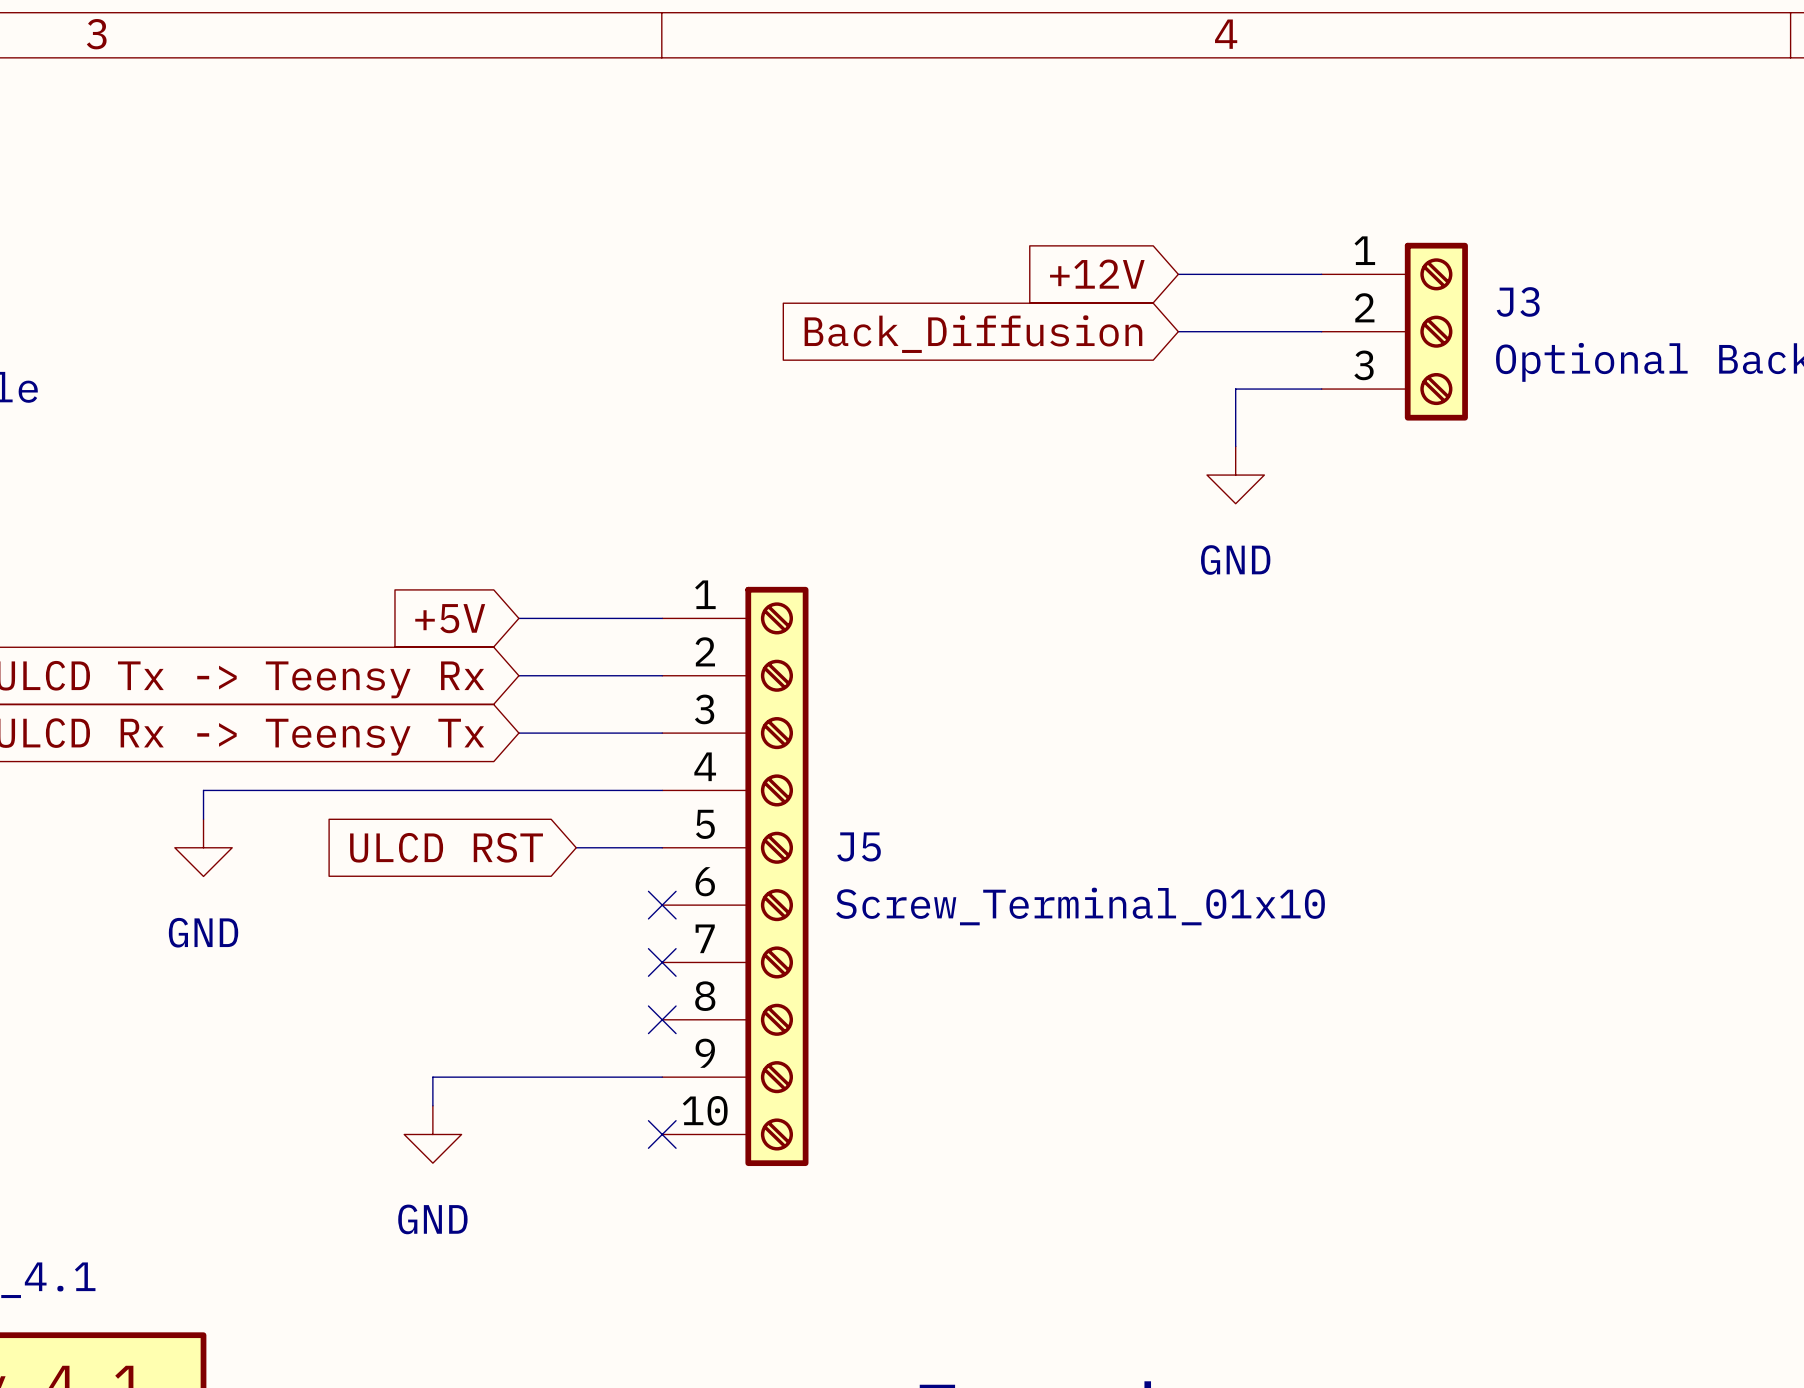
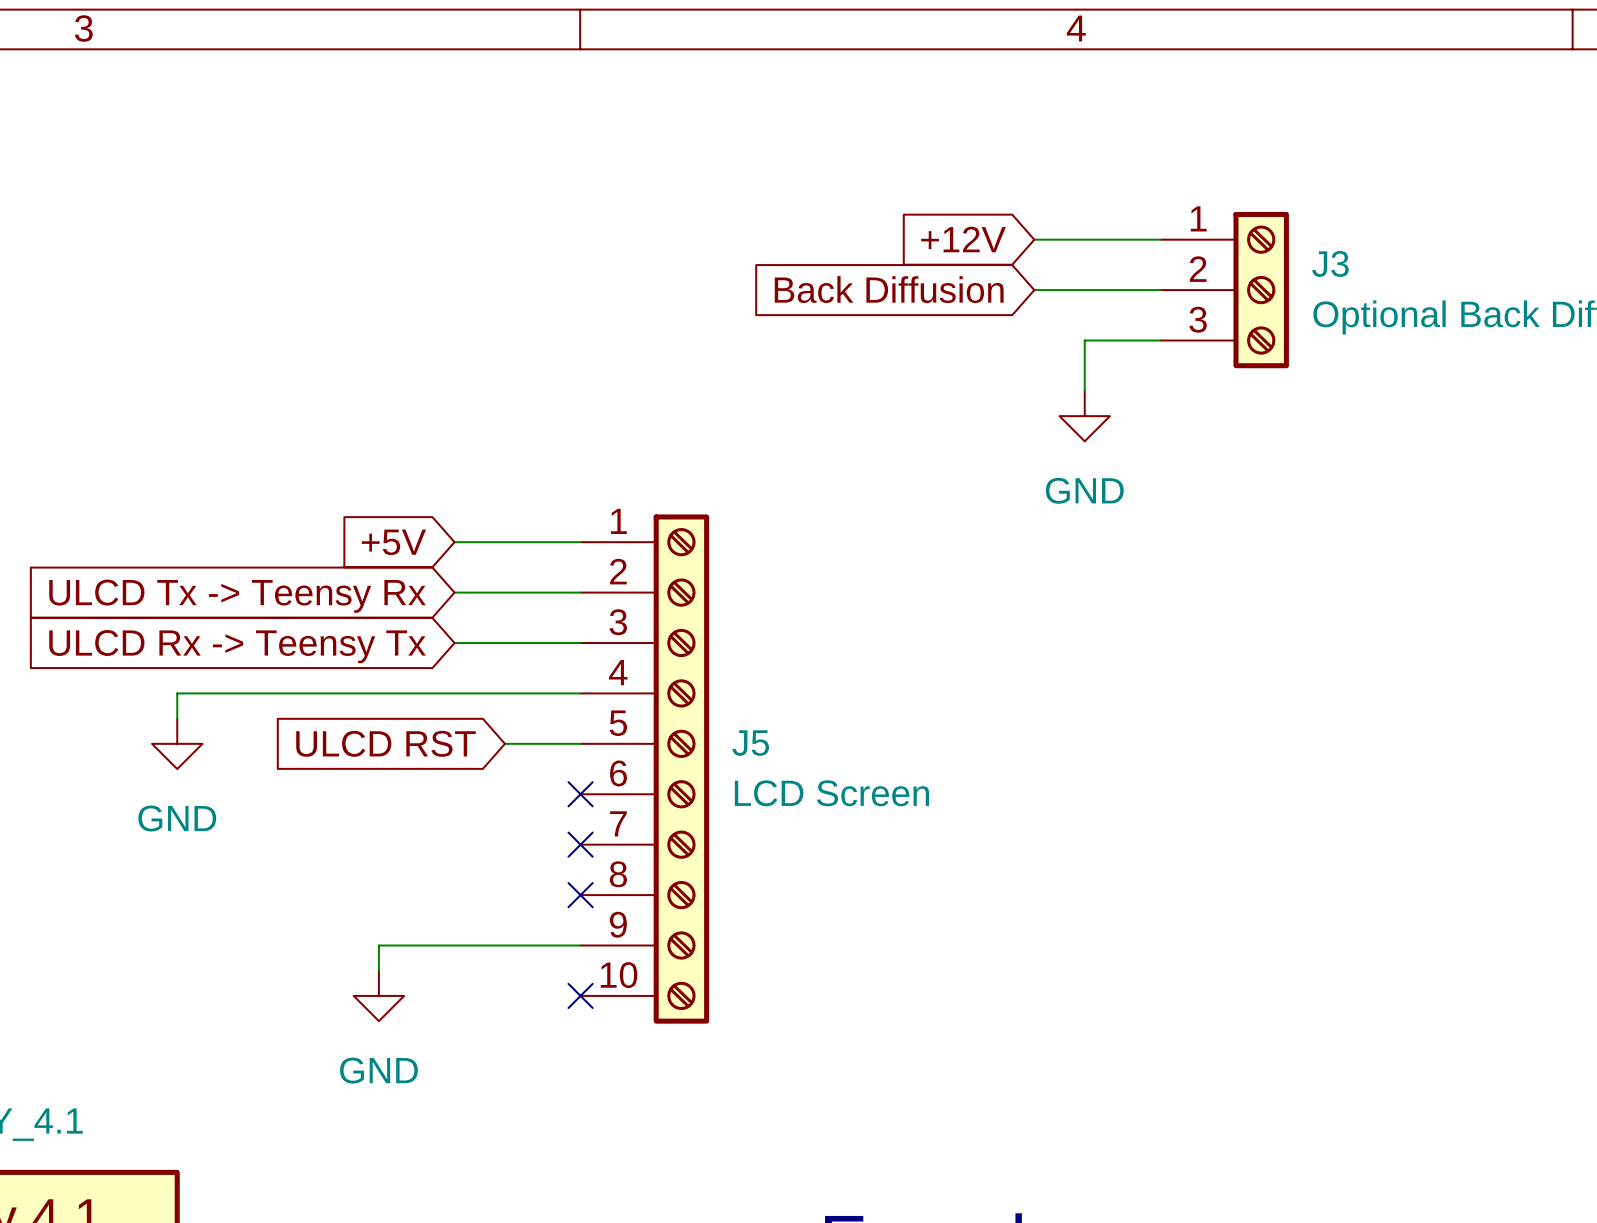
global label: Back_Diffusion (973, 334) -> Back Diffusion (889, 289)
J5 value: Screw_Terminal_01x10 (1080, 906) -> LCD Screen (831, 793)

